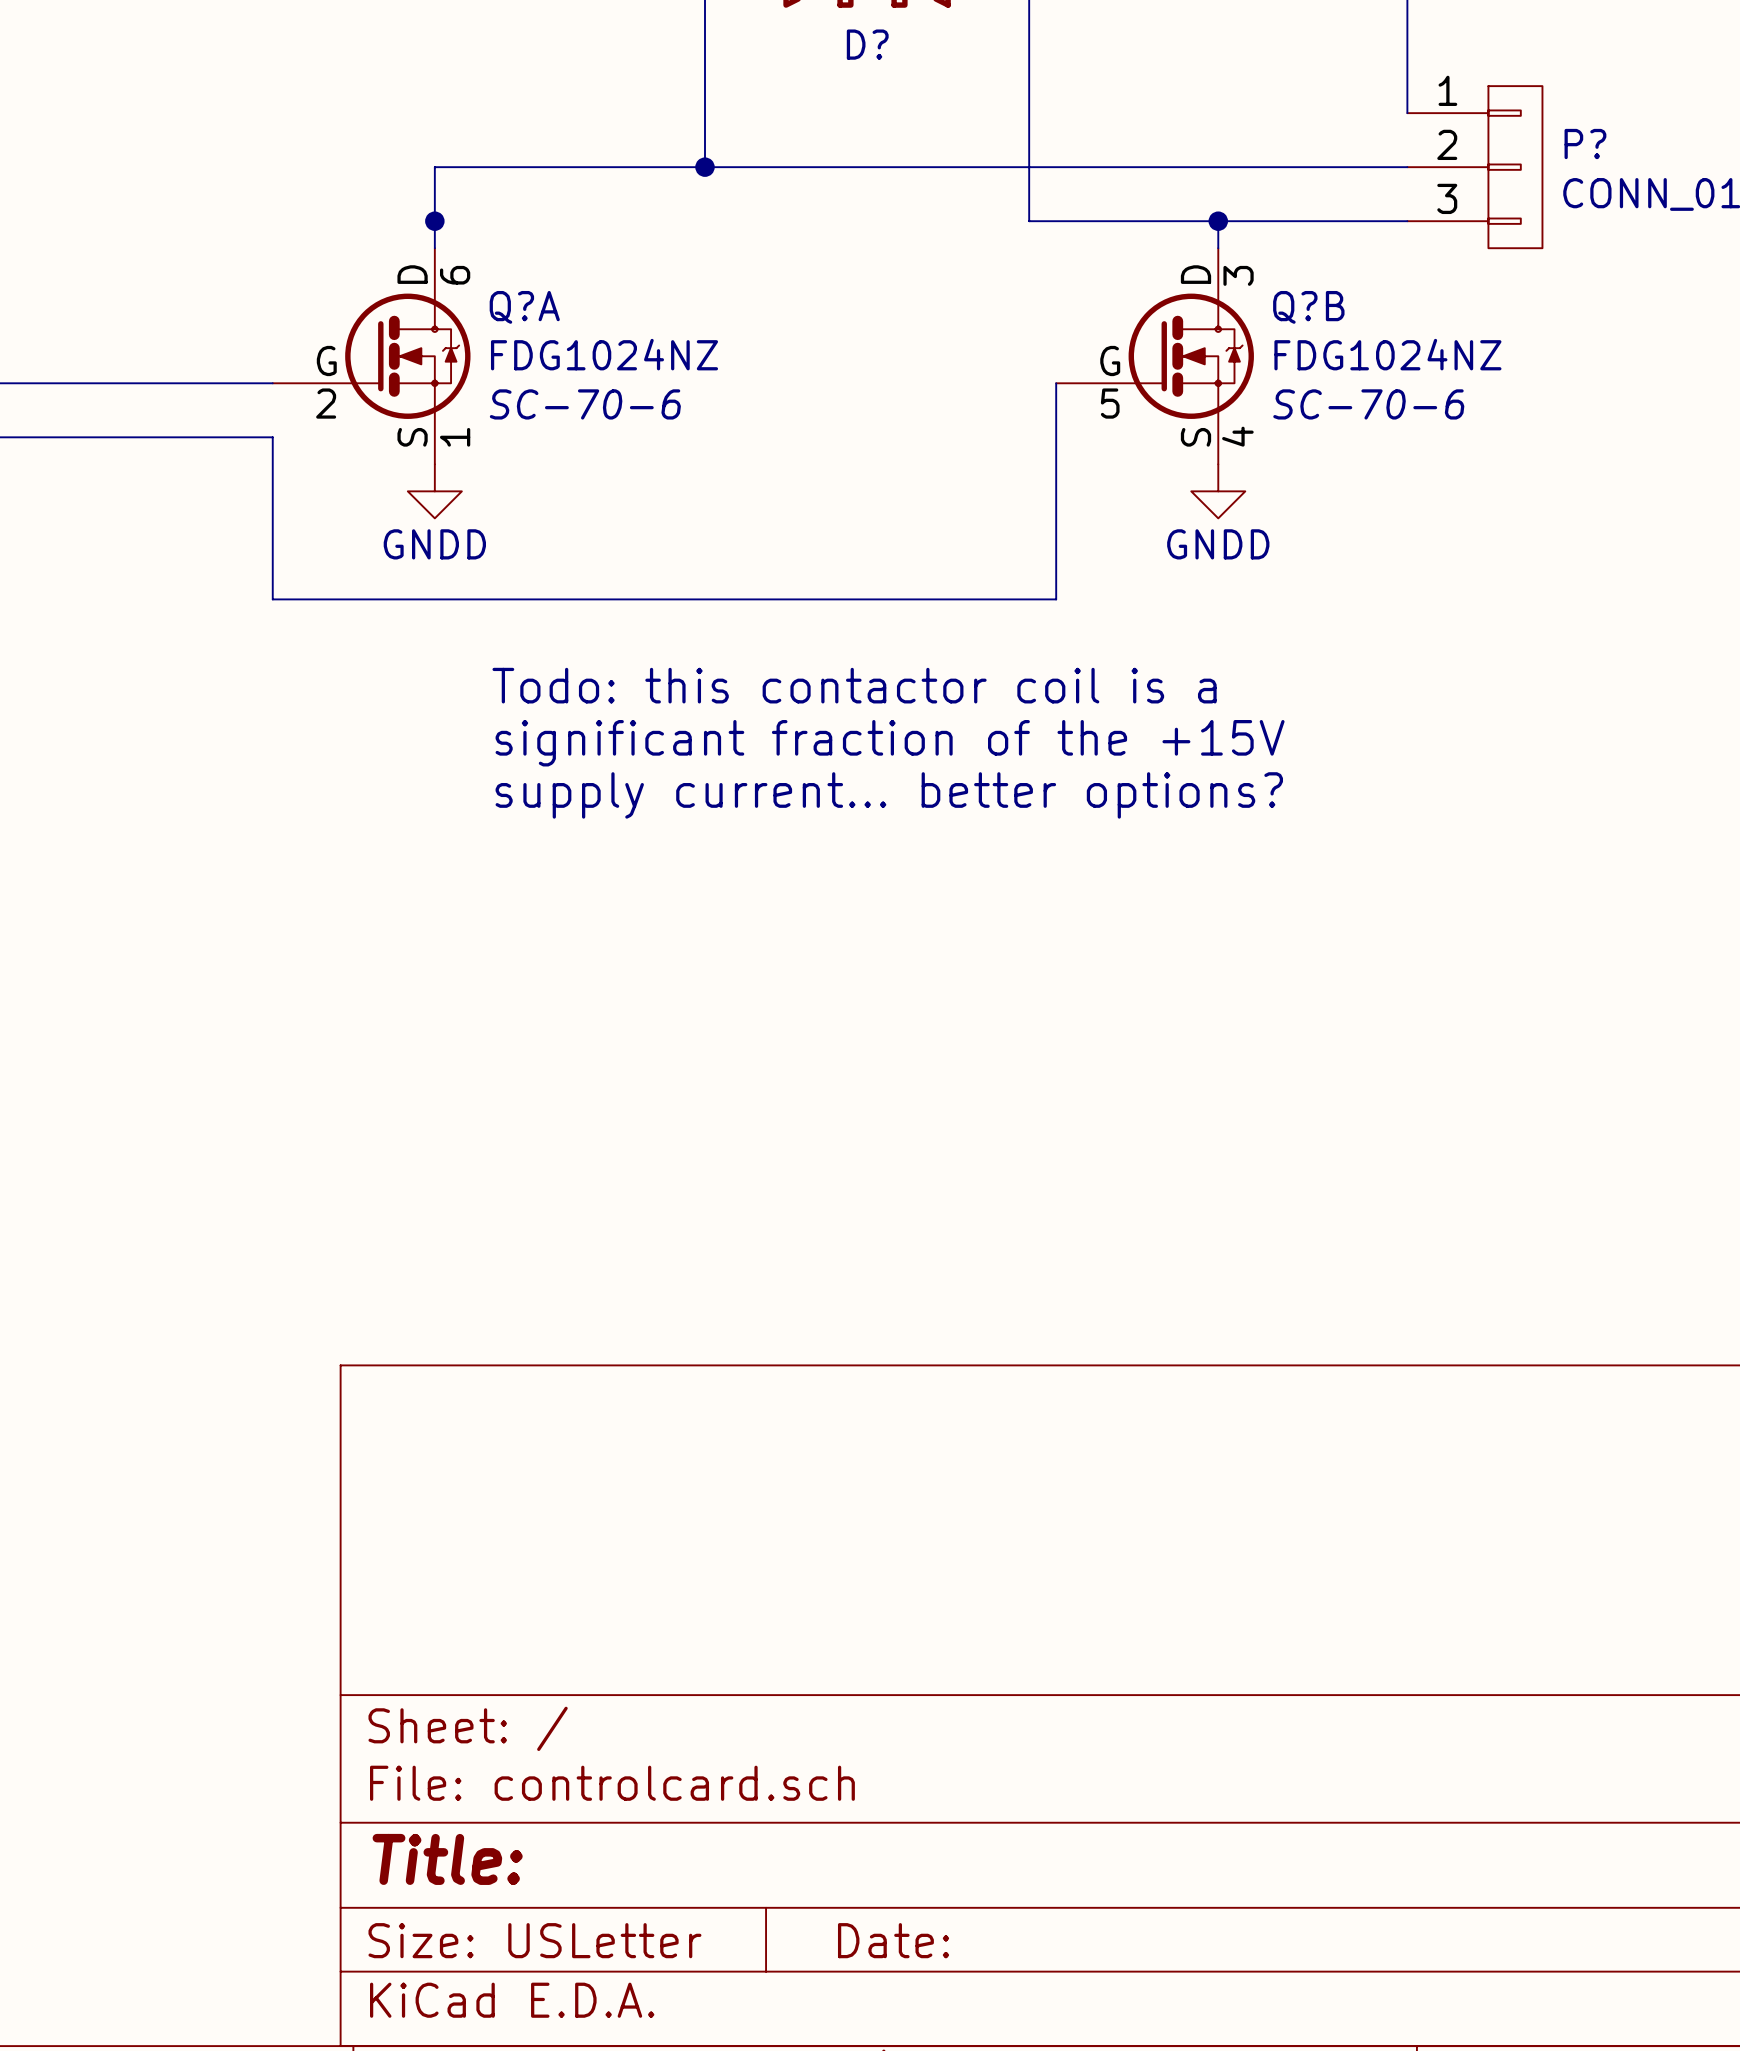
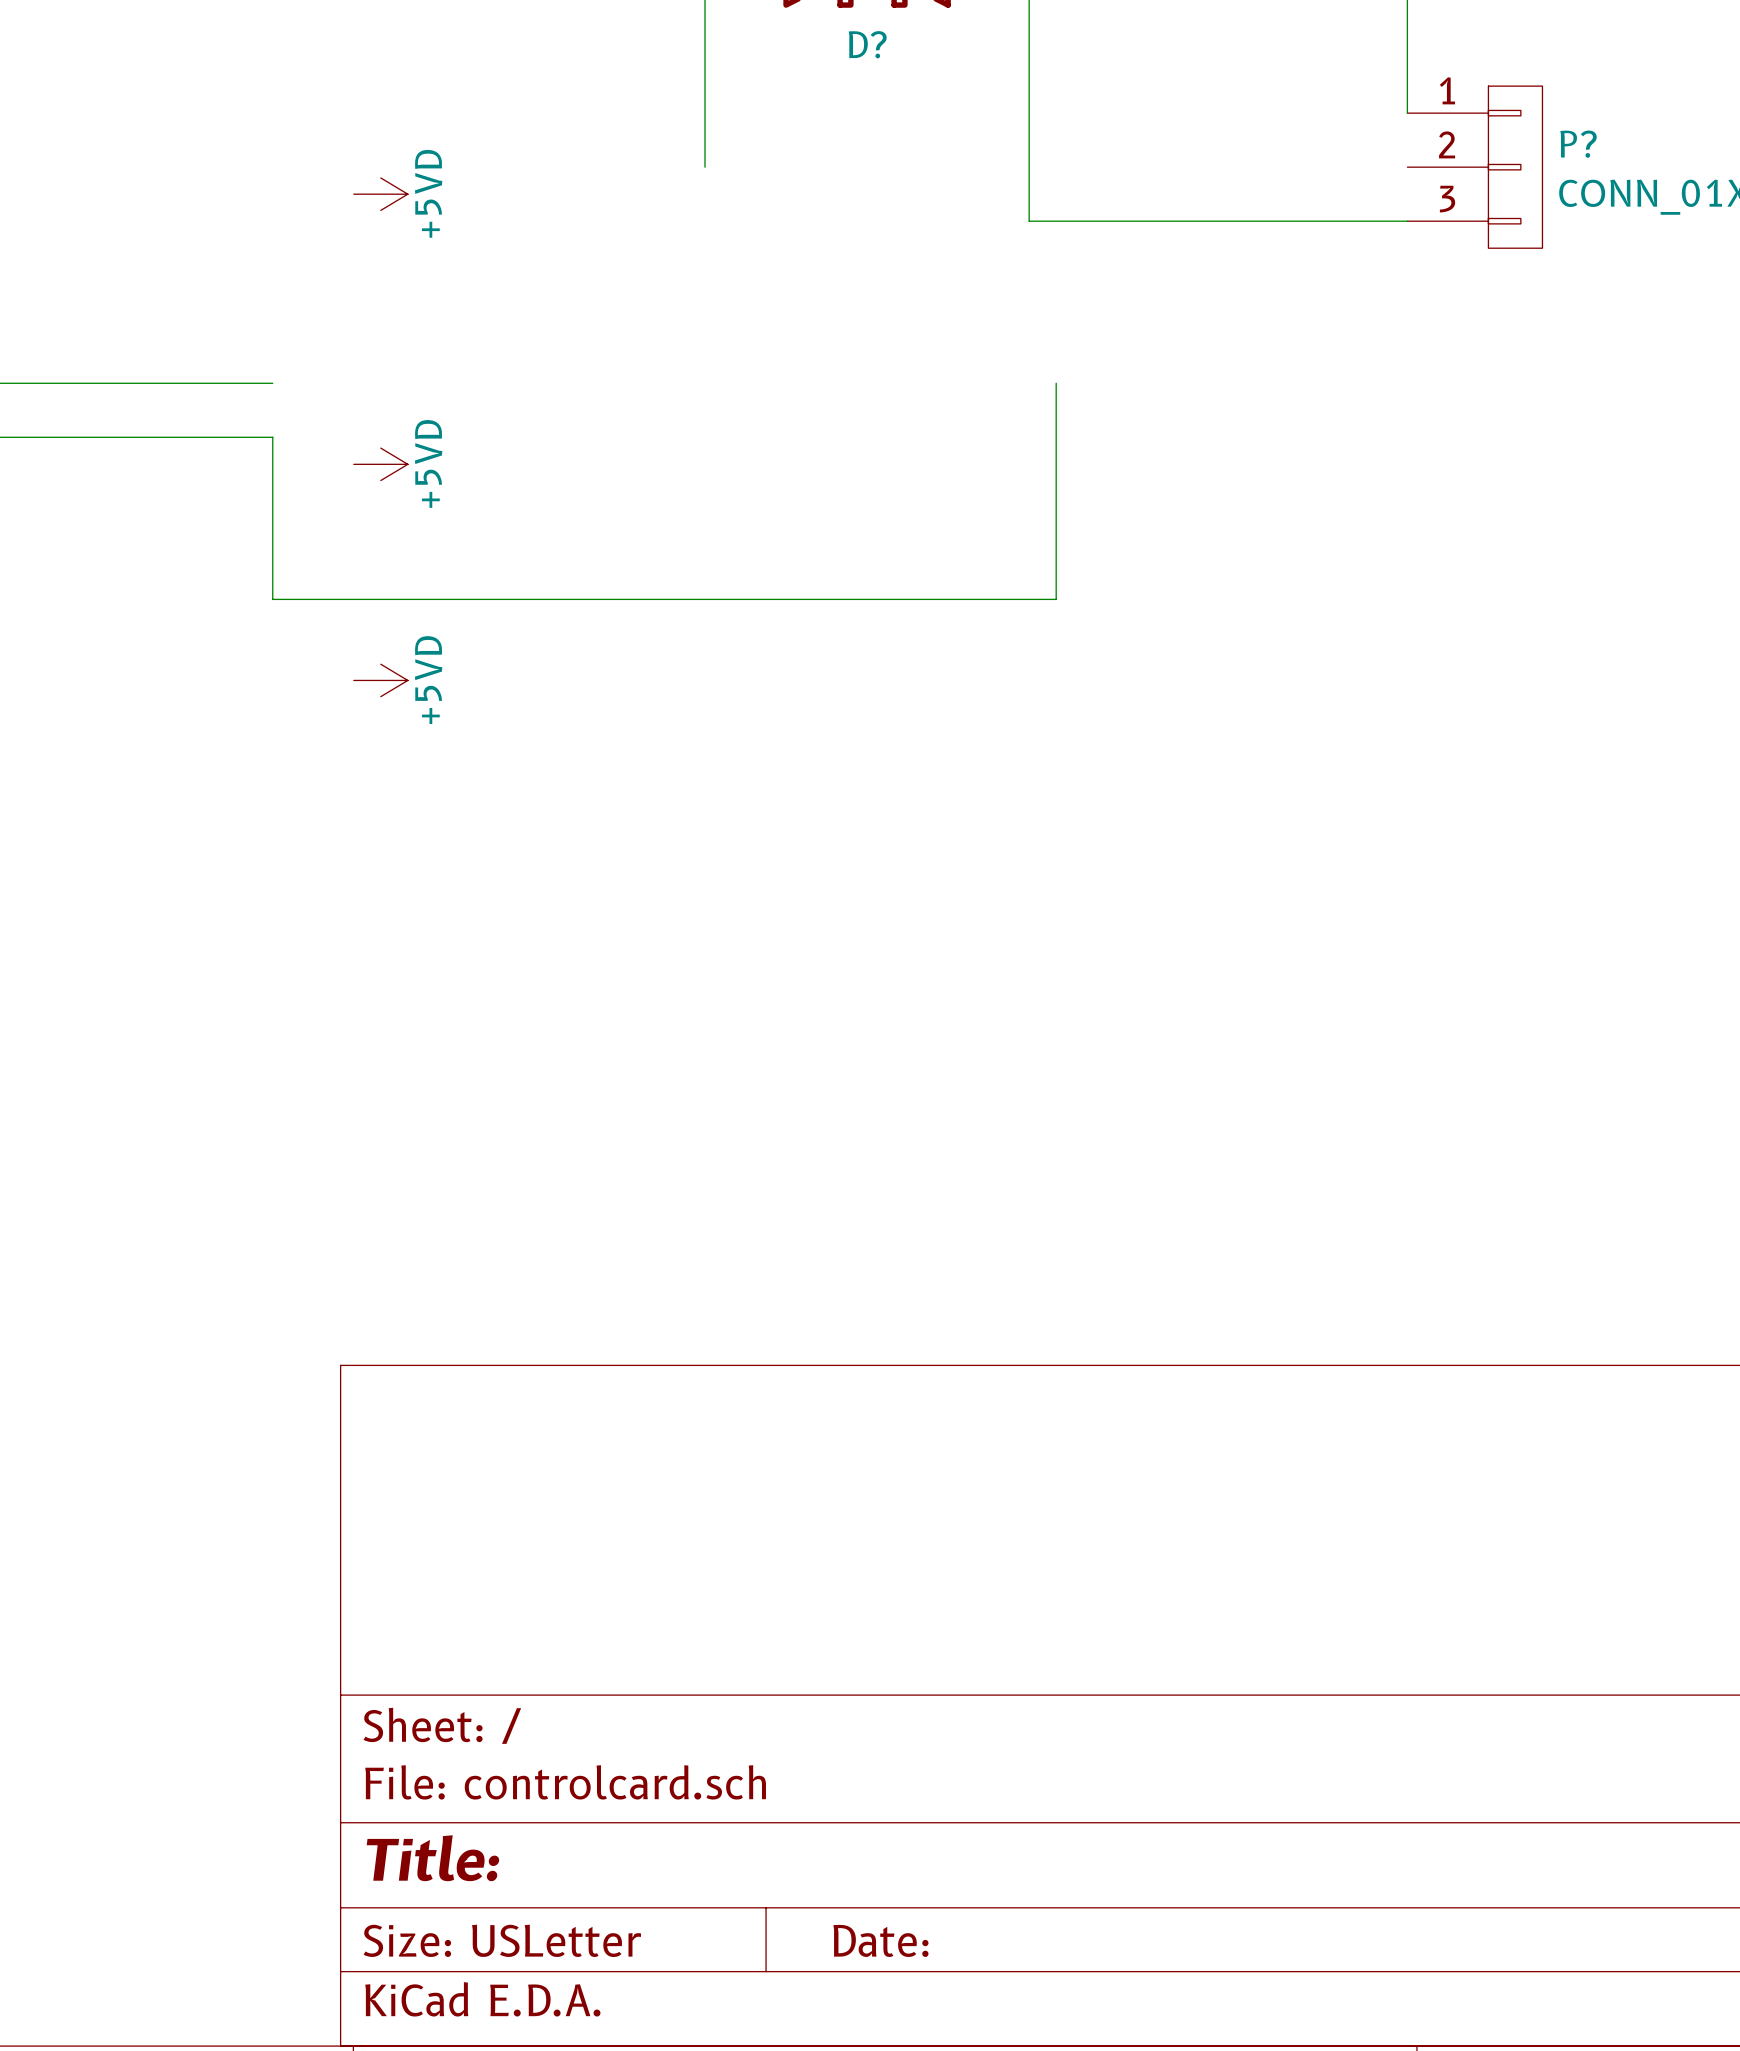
junction: (705, 167) -> none
wire: (1407, 167) (434, 167) (434, 248) -> none
power symbol: none -> +5VD (380, 194)
junction: (434, 221) -> none
wire: (1218, 221) (1218, 248) -> none
junction: (1218, 221) -> none
Q?A: FDG1024NZ (371, 356) -> none
Q?B: FDG1024NZ (1155, 356) -> none
power symbol: none -> +5VD (380, 464)
power symbol: GNDD (434, 491) -> none
power symbol: GNDD (1218, 491) -> none
power symbol: none -> +5VD (380, 680)
text: Todo: this contactor coil is a (854, 685) -> none
text: significant fraction of the +15V (890, 743) -> none
text: supply current... better options? (889, 795) -> none

